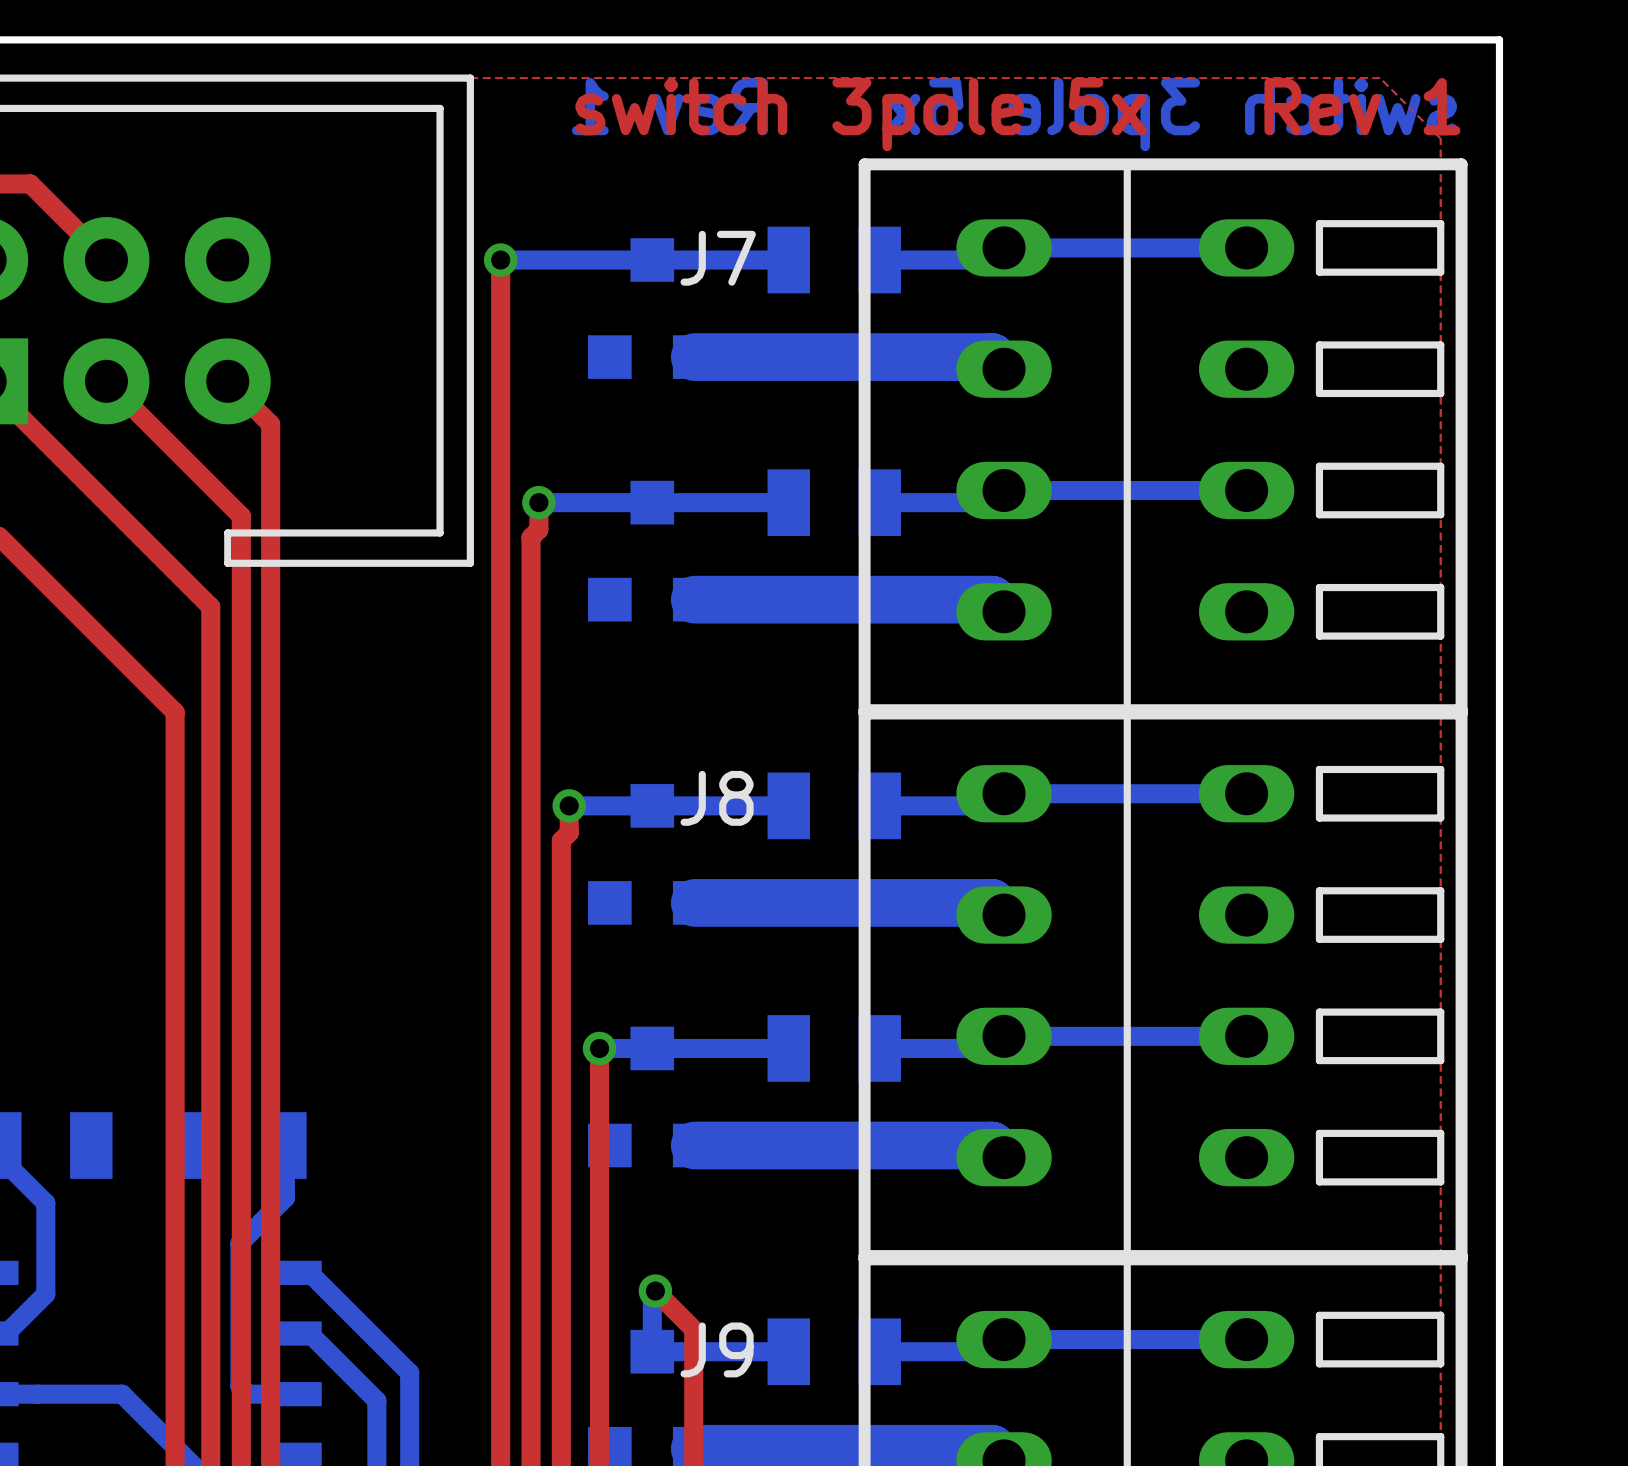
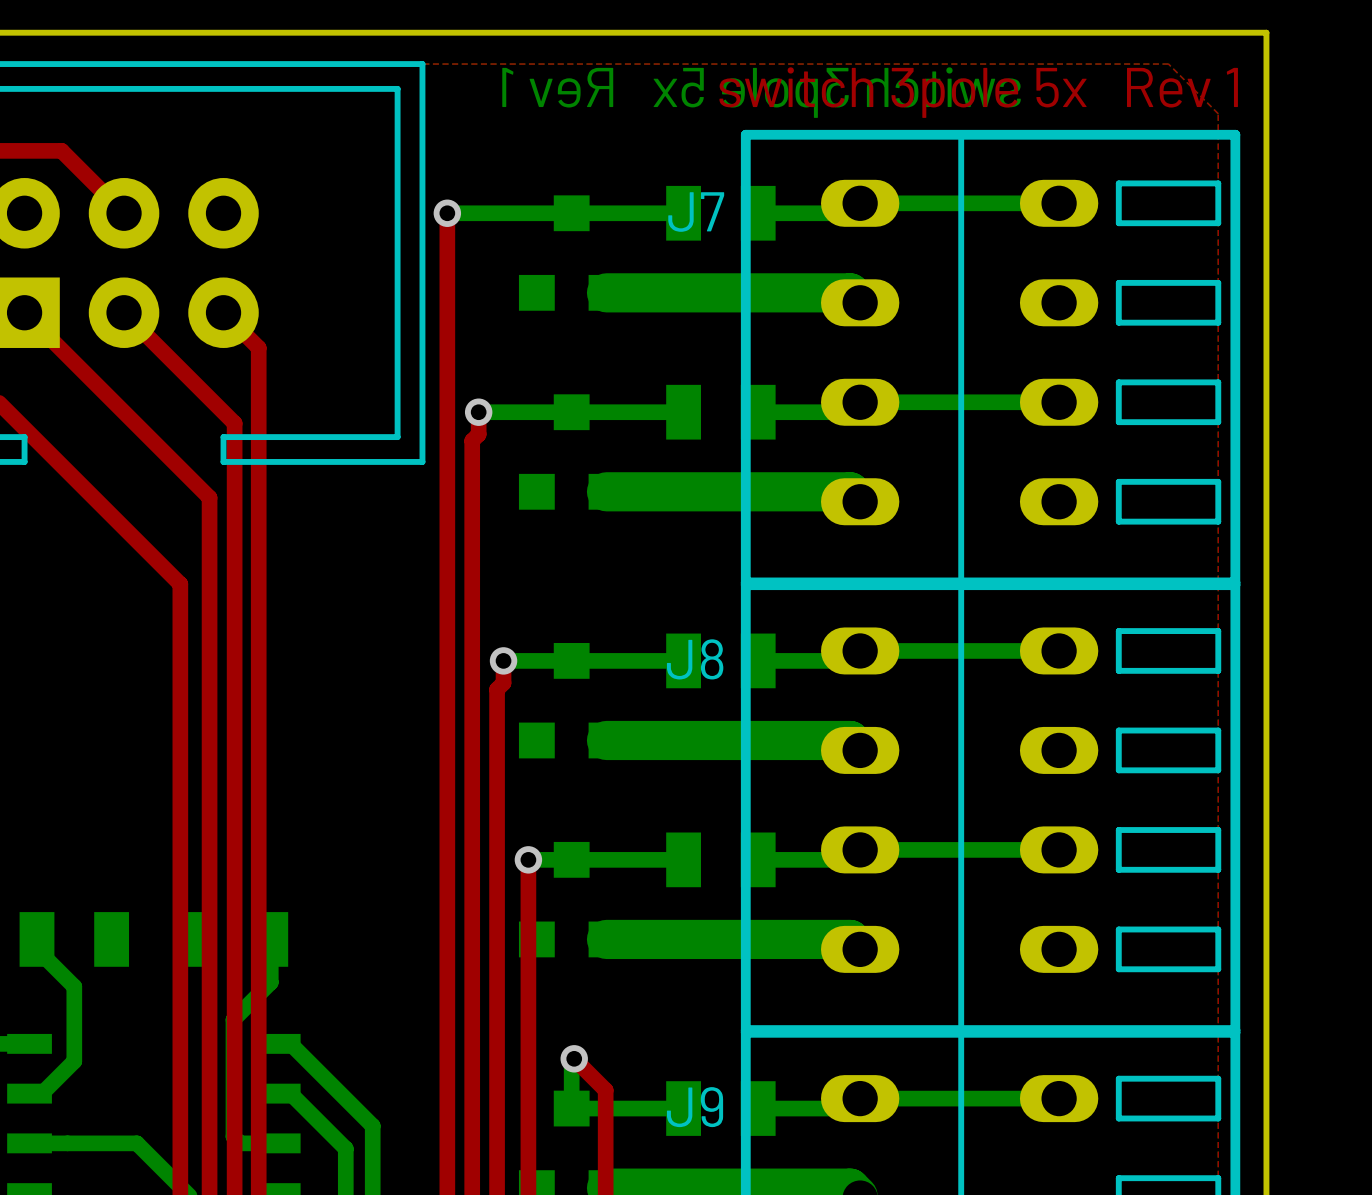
J7 name position: J7 (718, 258) -> J7 (696, 212)
J8 name position: J8 (717, 798) -> J8 (695, 659)
J9 name position: J9 (717, 1349) -> J9 (695, 1107)

